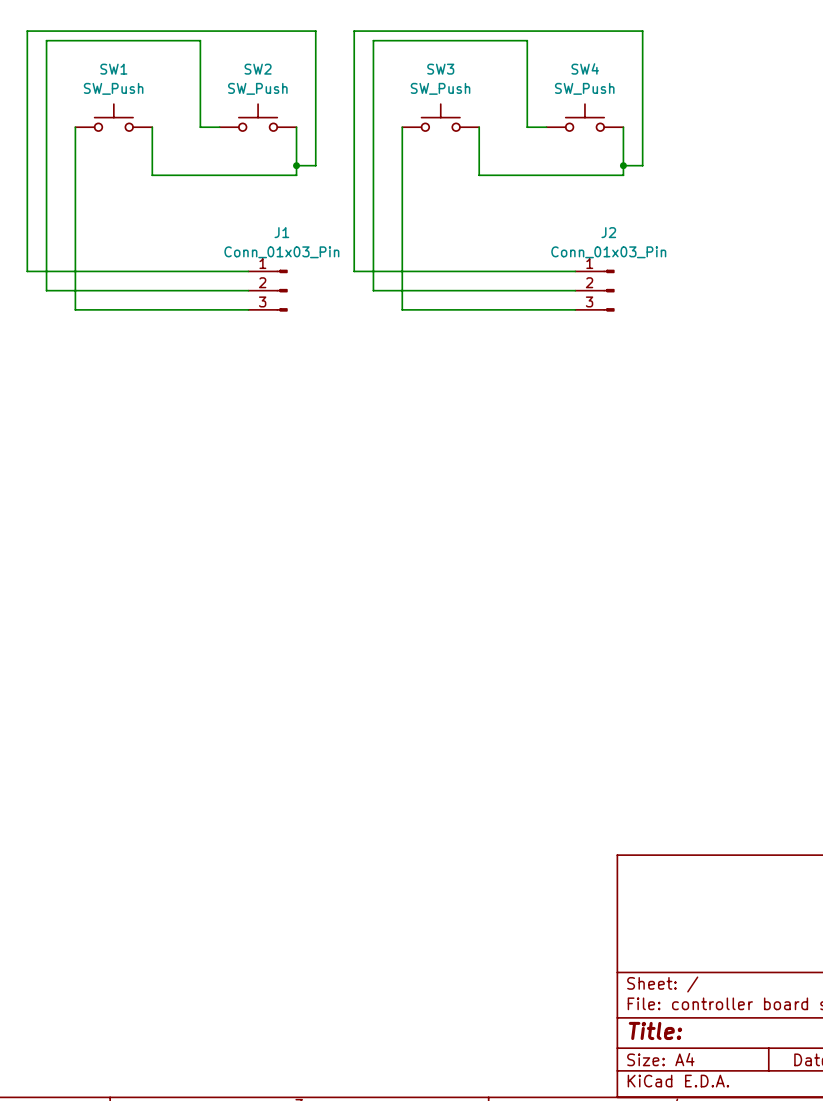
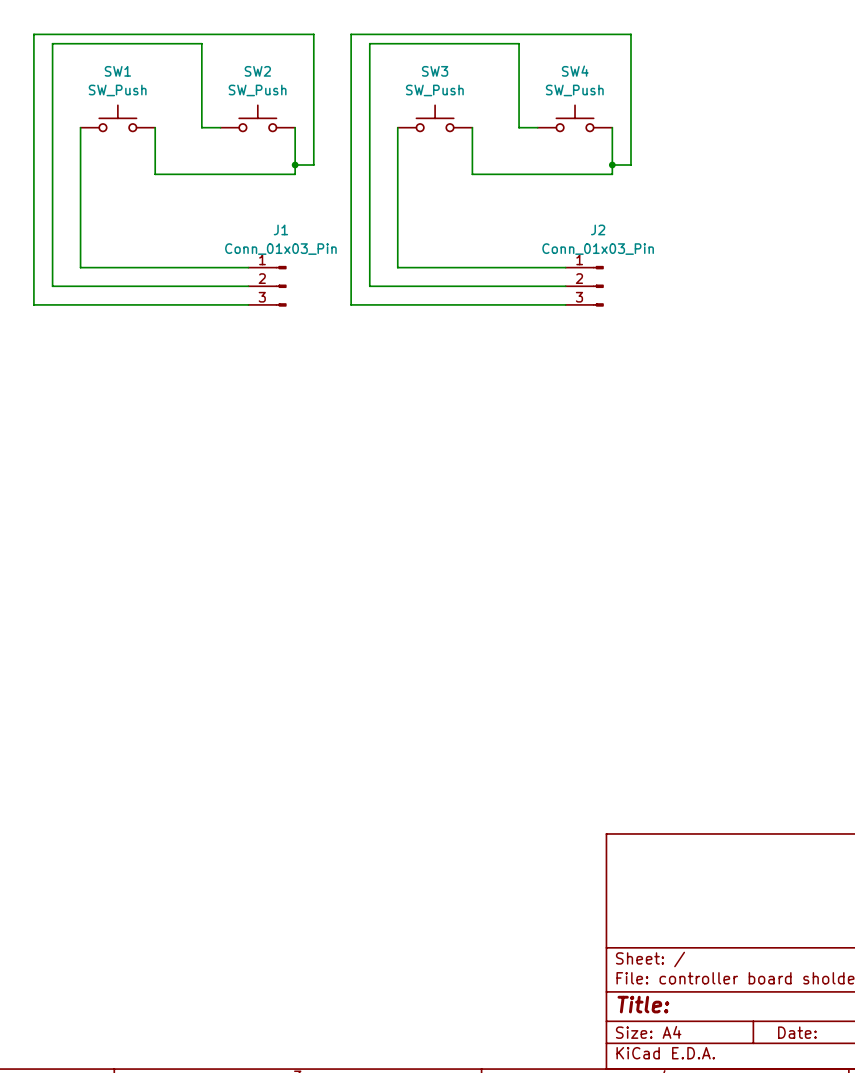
wire: (27, 271) (75, 271) (75, 309) -> (33, 267) (33, 304) (80, 304)
wire: (354, 271) (402, 271) (402, 309) -> (351, 267) (351, 304) (397, 304)

